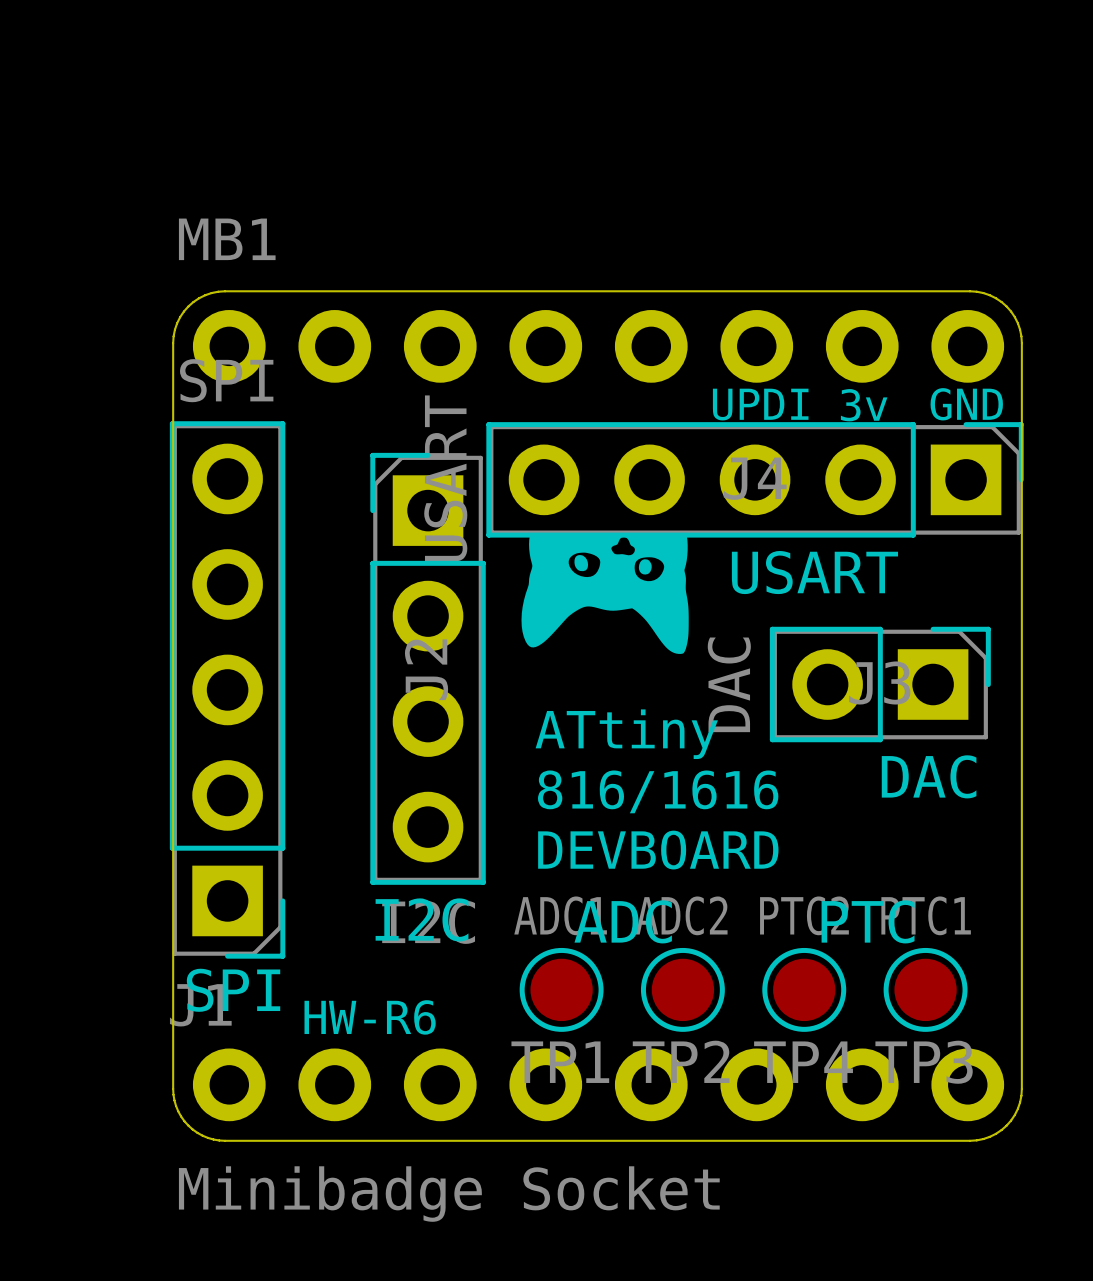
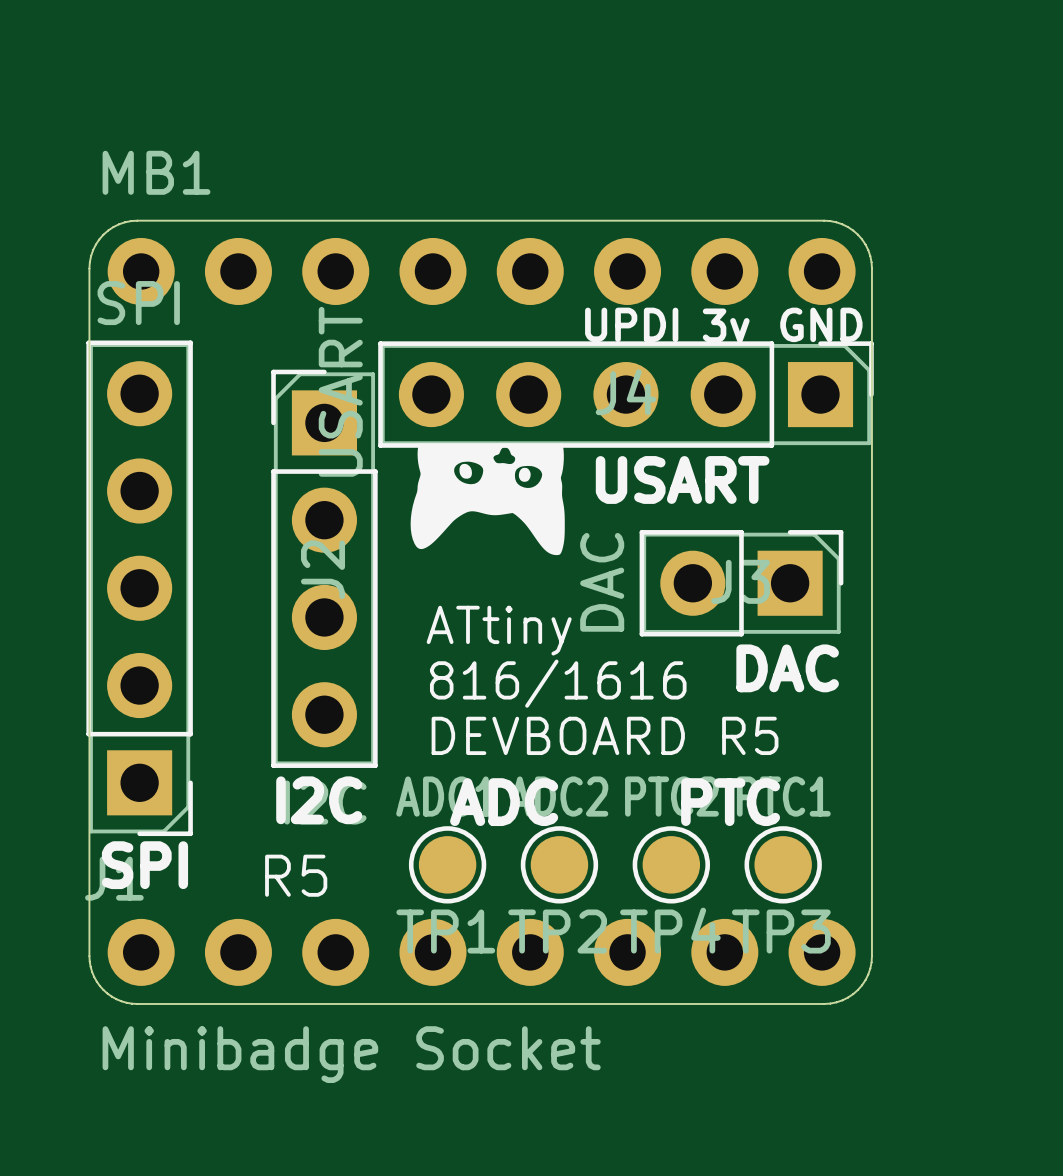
text: DEVBOARD (658, 850) -> DEVBOARD R5 (605, 735)
text: none -> R5 (296, 875)
text: HW-R6 (370, 1017) -> none

